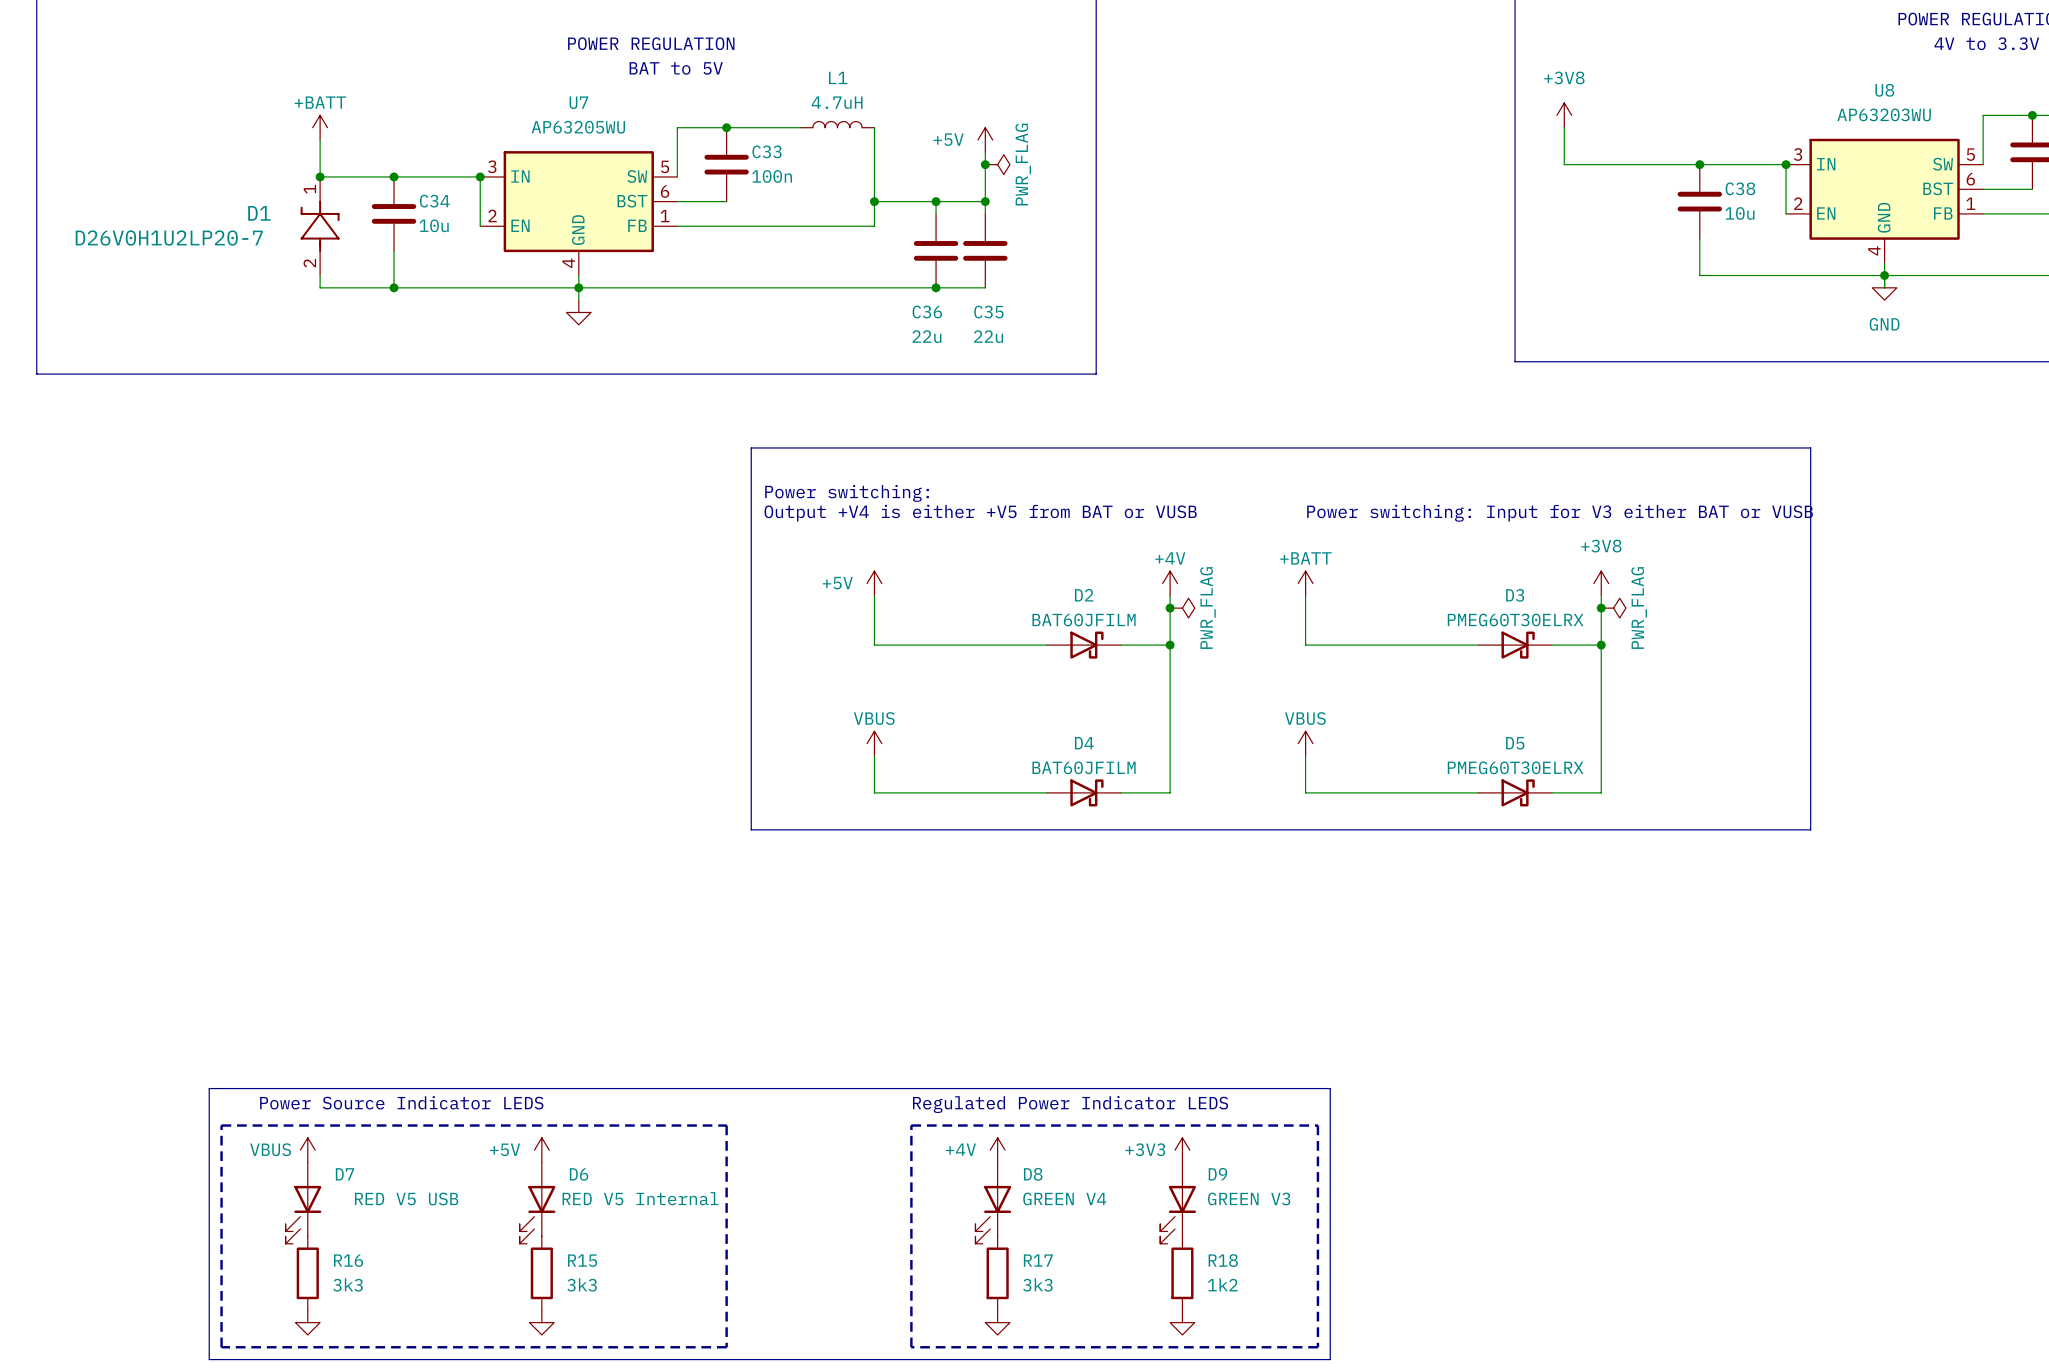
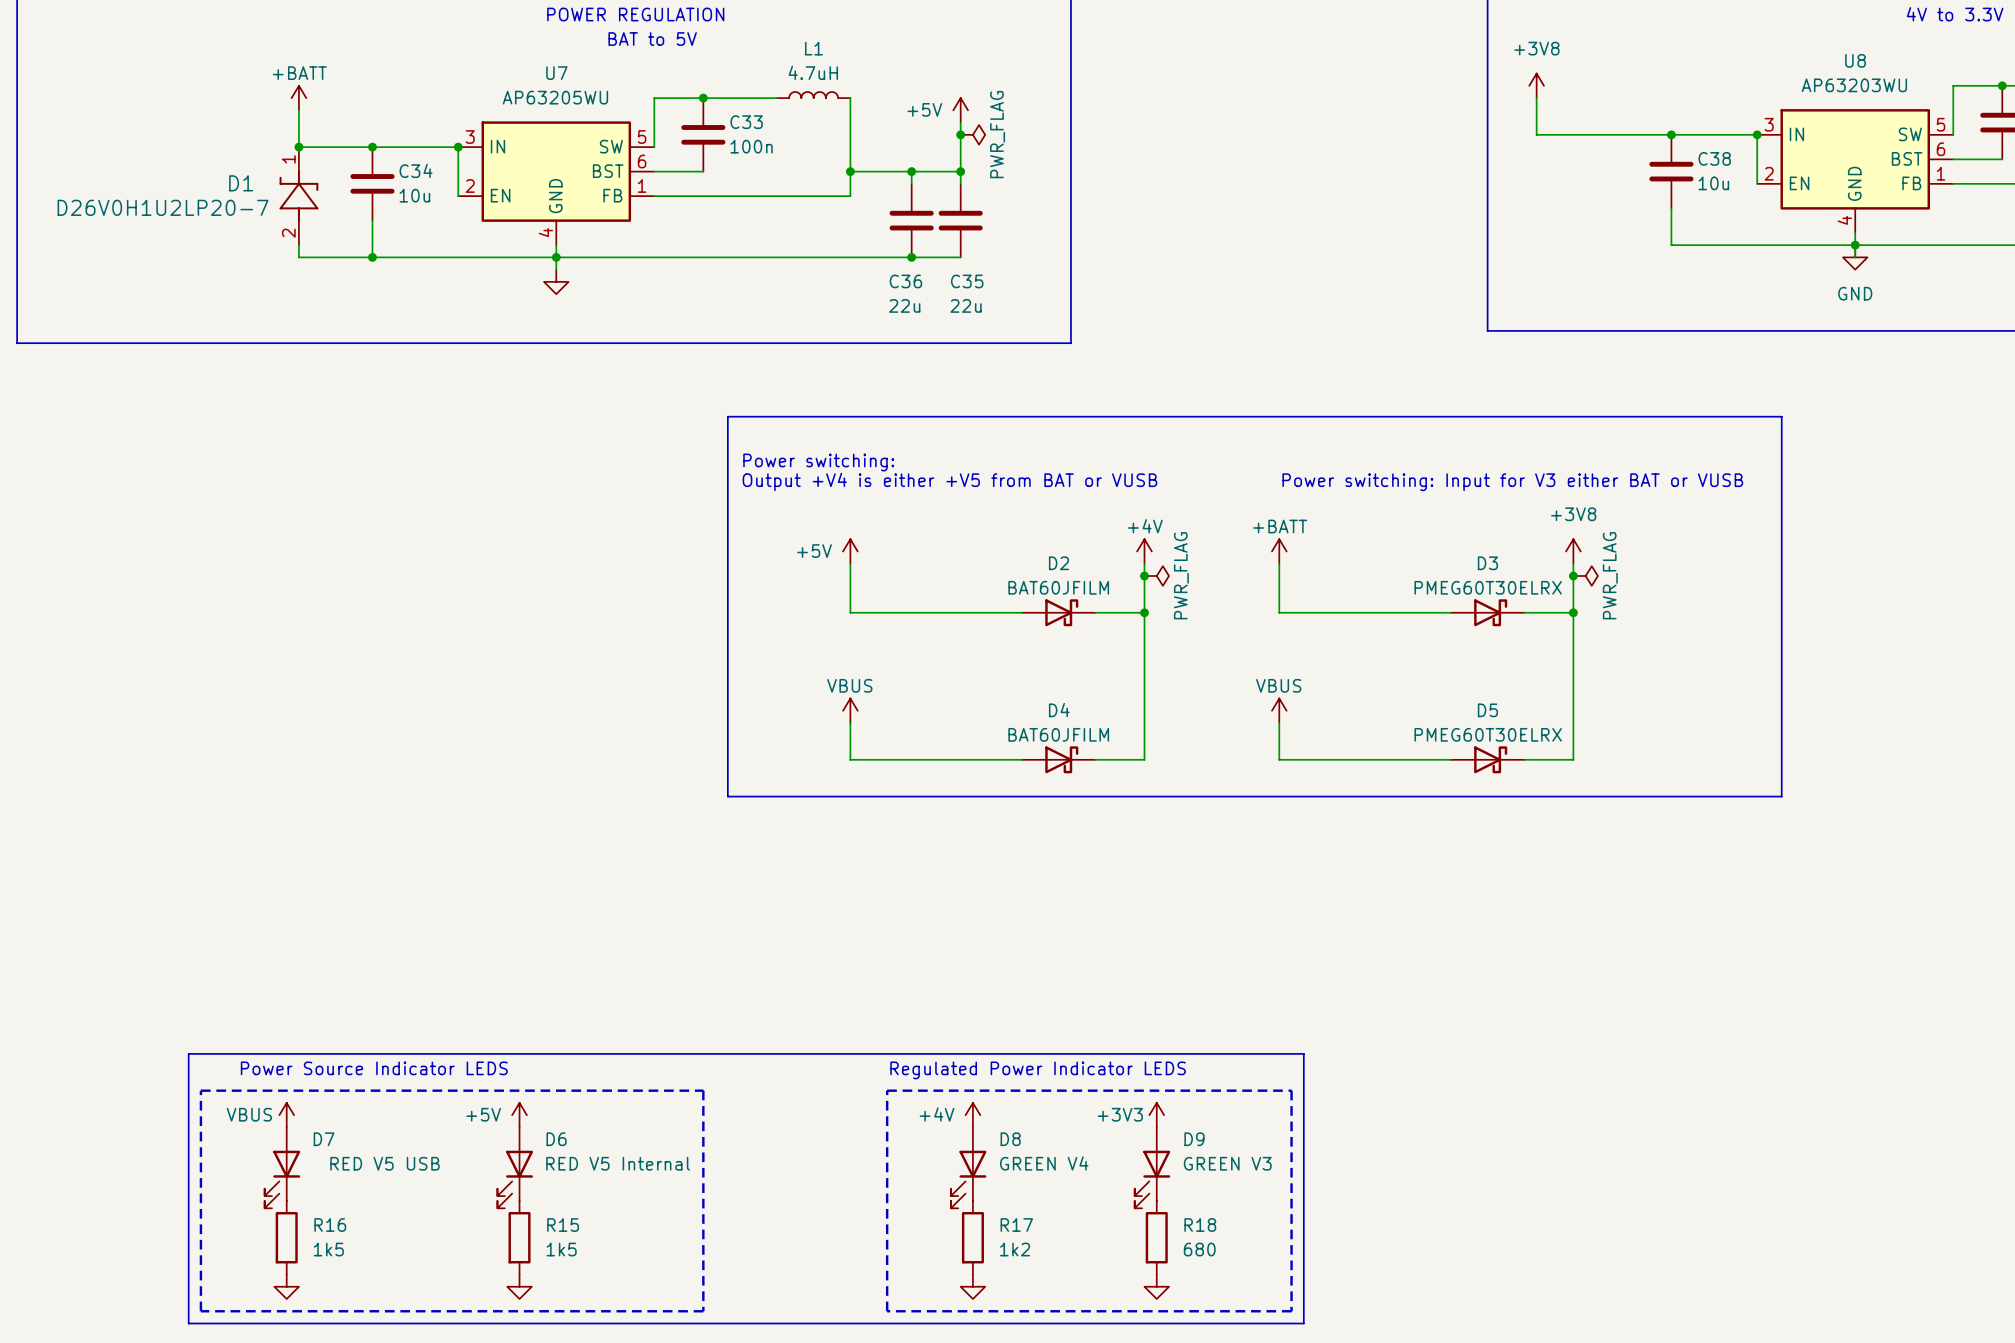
R16 value: 3k3 (348, 1284) -> 1k5 (328, 1249)
R15 value: 3k3 (582, 1284) -> 1k5 (561, 1249)
R17 value: 3k3 (1037, 1284) -> 1k2 (1015, 1249)
R18 value: 1k2 (1222, 1284) -> 680 (1199, 1249)

